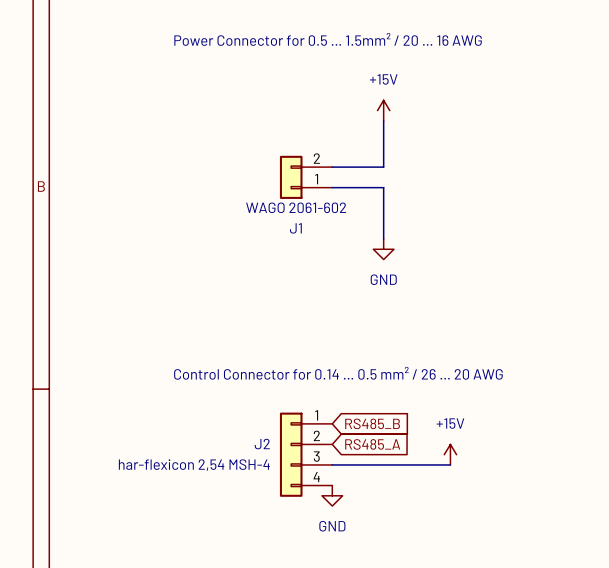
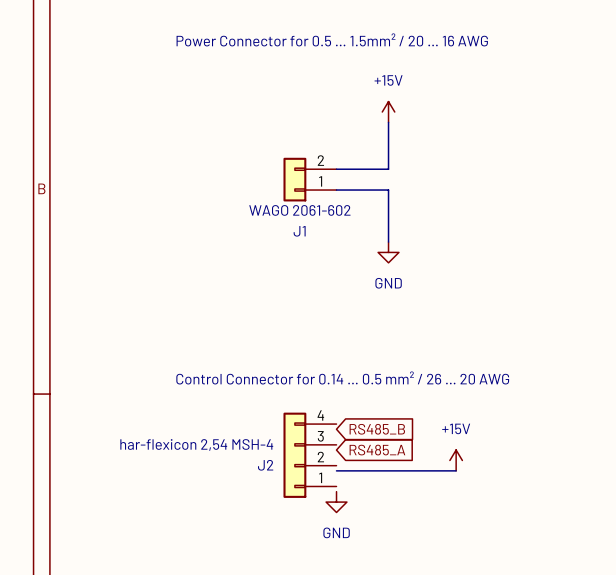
J2 flip: as is (291, 454) -> up-down (294, 455)

